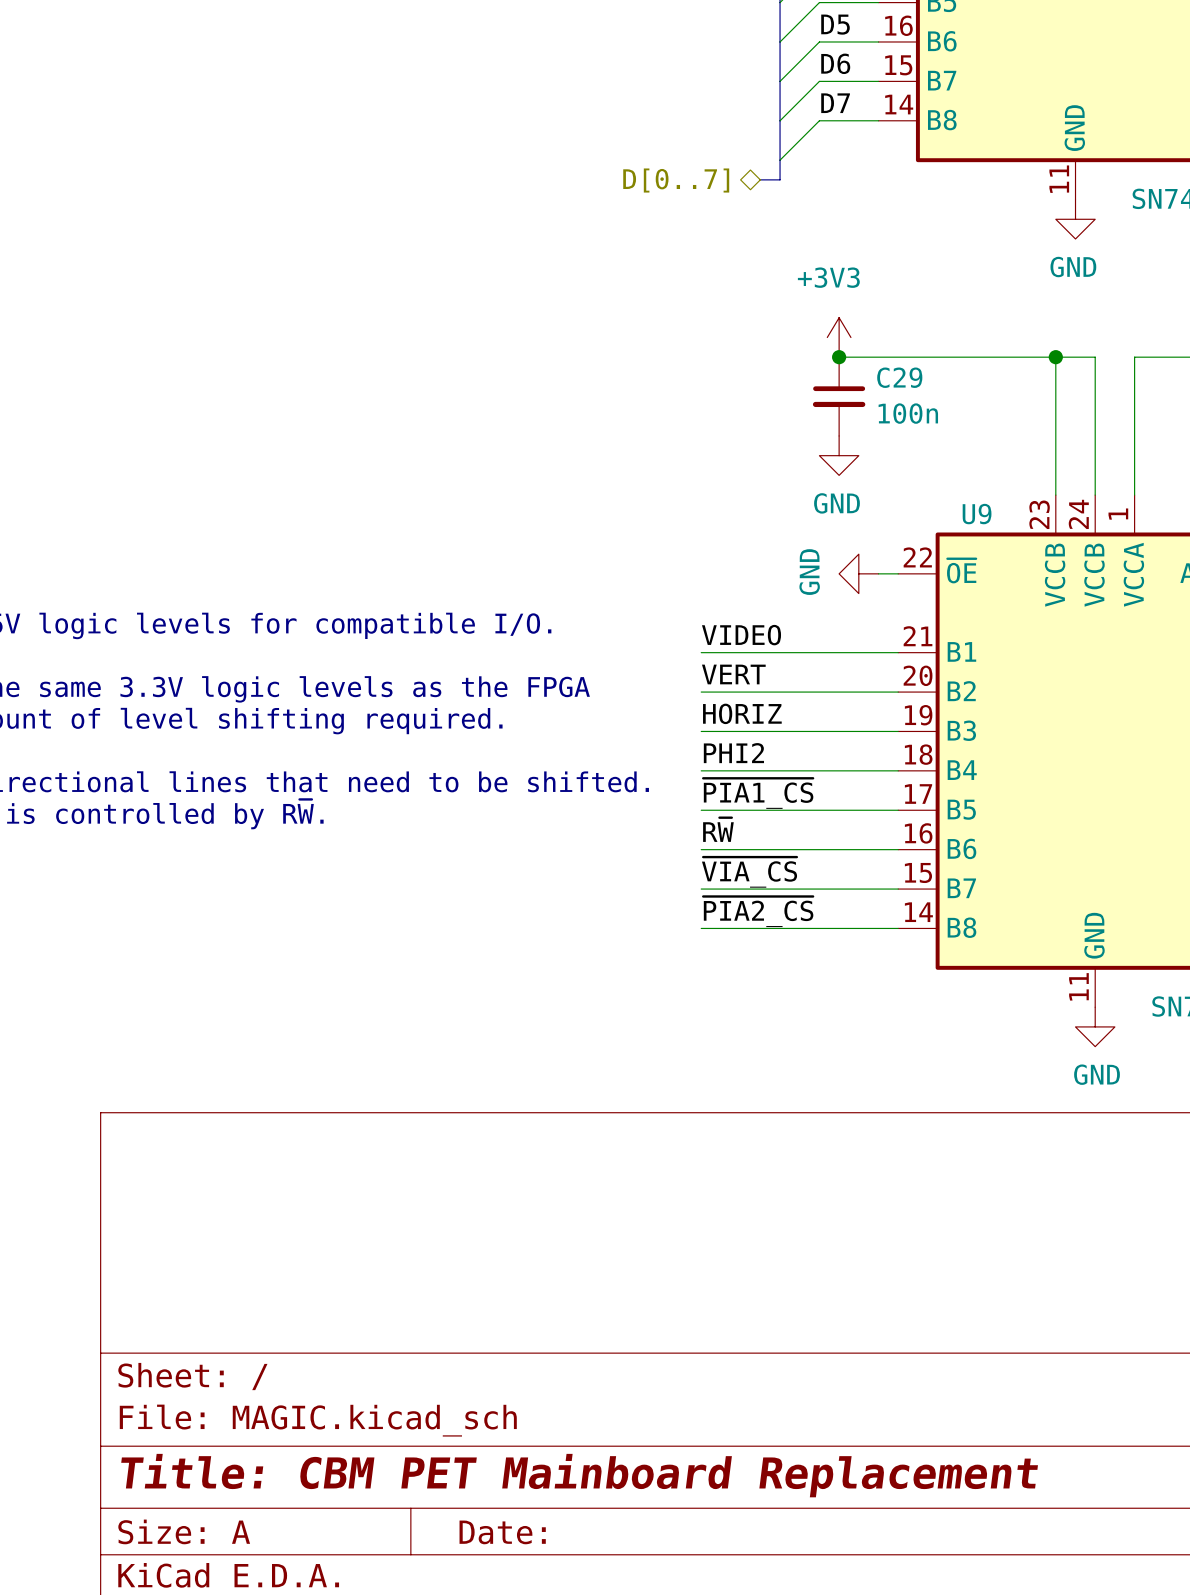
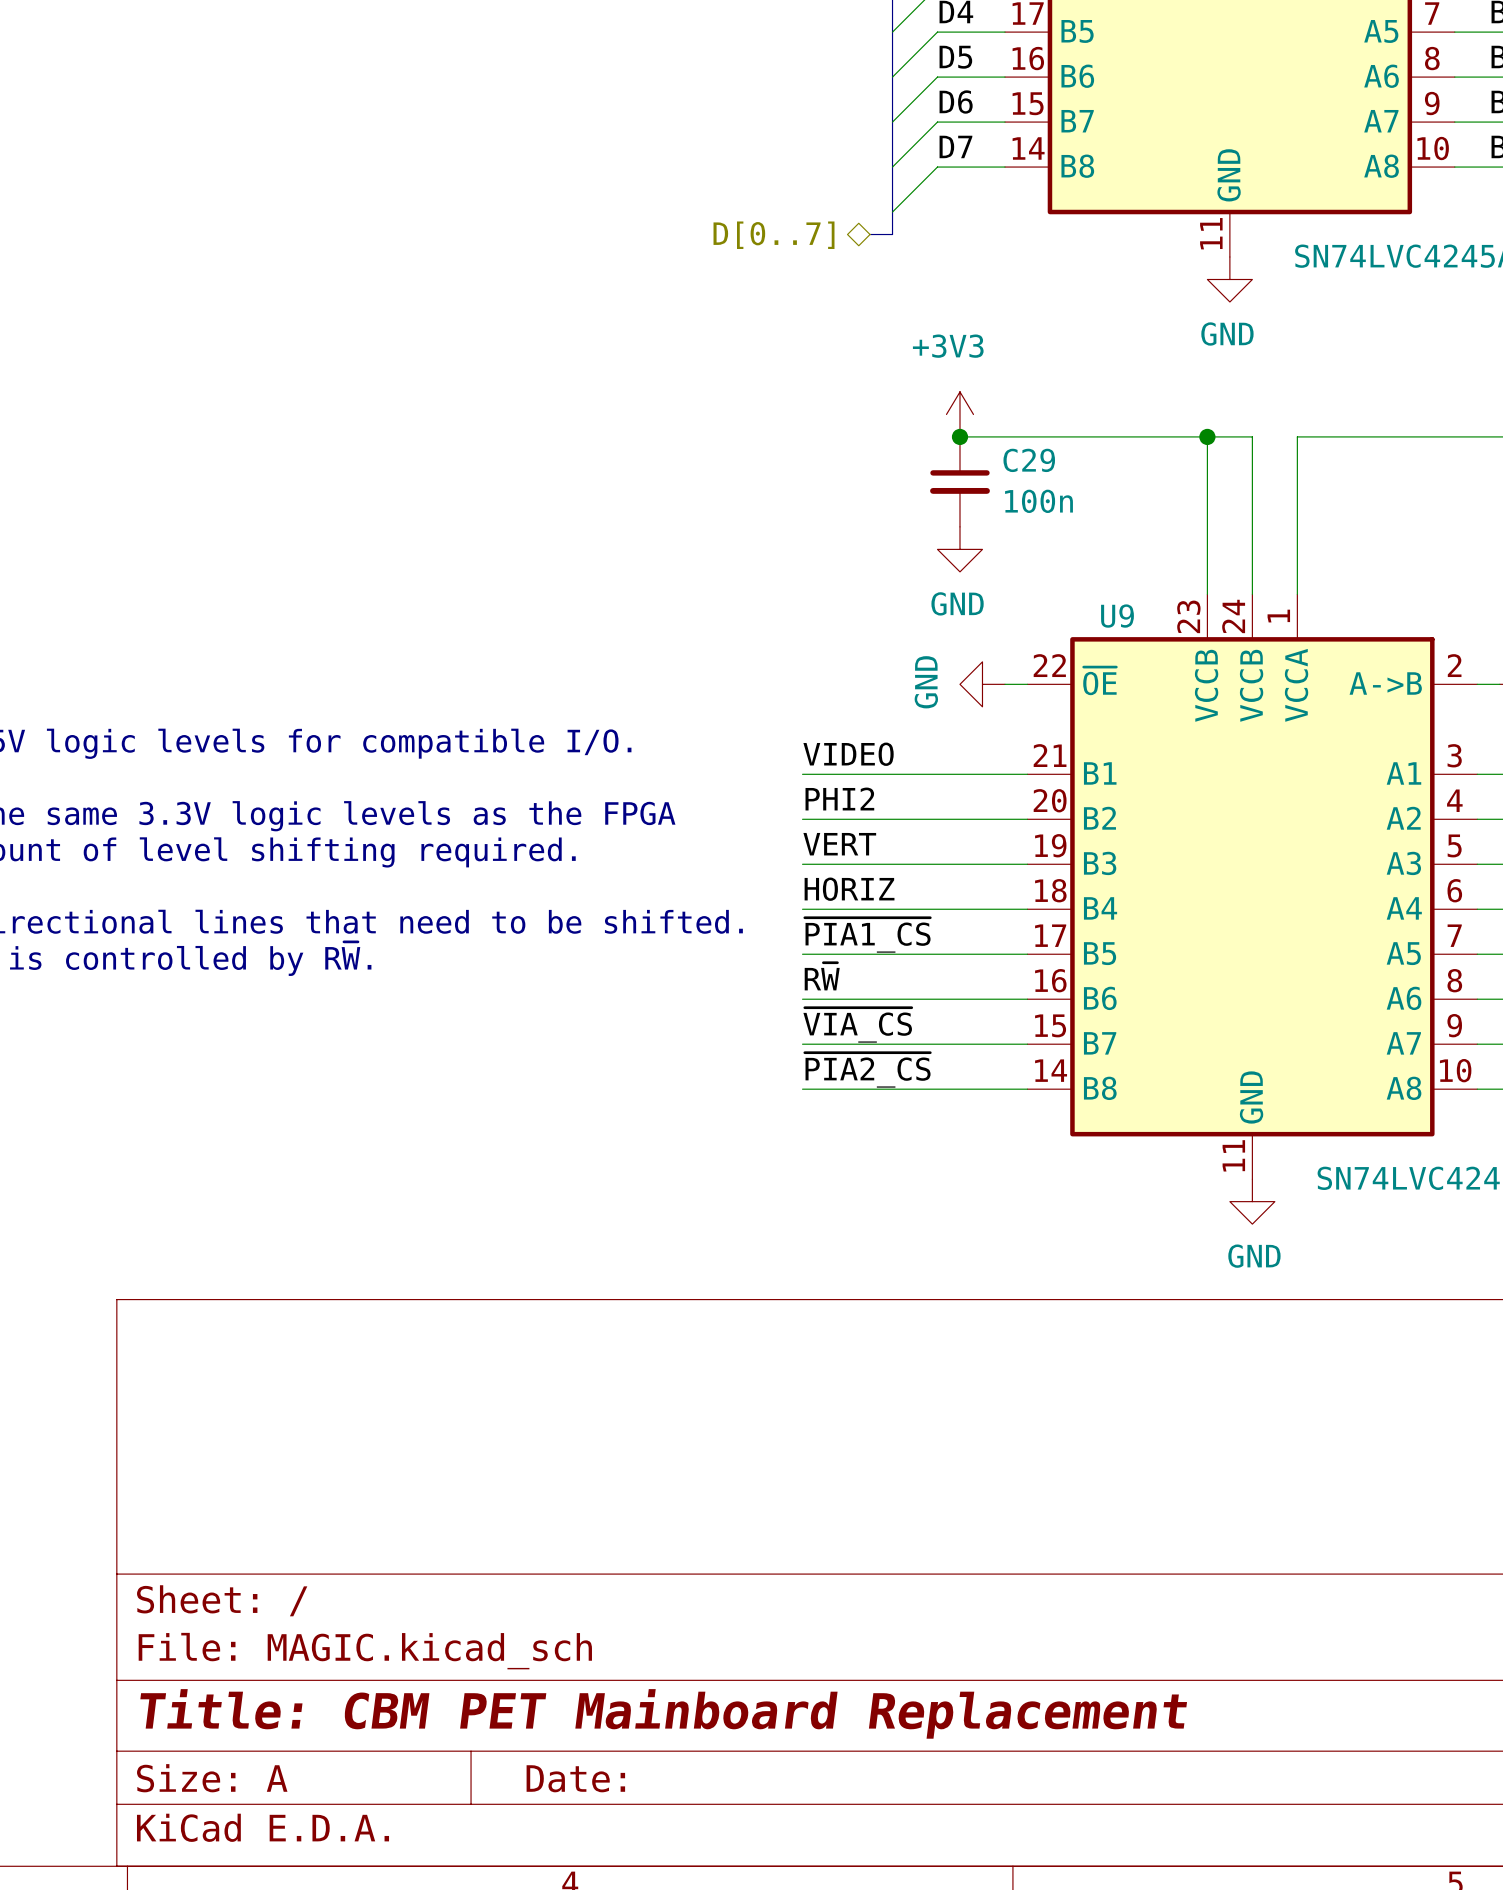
label: VERT (733, 674) -> PHI2 (839, 799)
label: HORIZ (742, 713) -> VERT (839, 844)
label: PHI2 (733, 753) -> HORIZ (849, 889)

